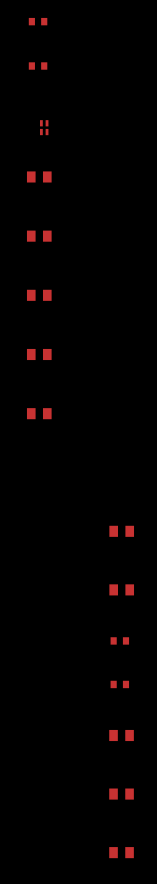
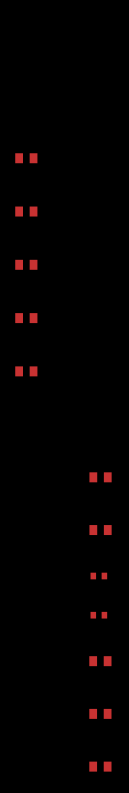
part: (38, 21) -> none
part: (38, 66) -> none
part: (44, 127) -> none

